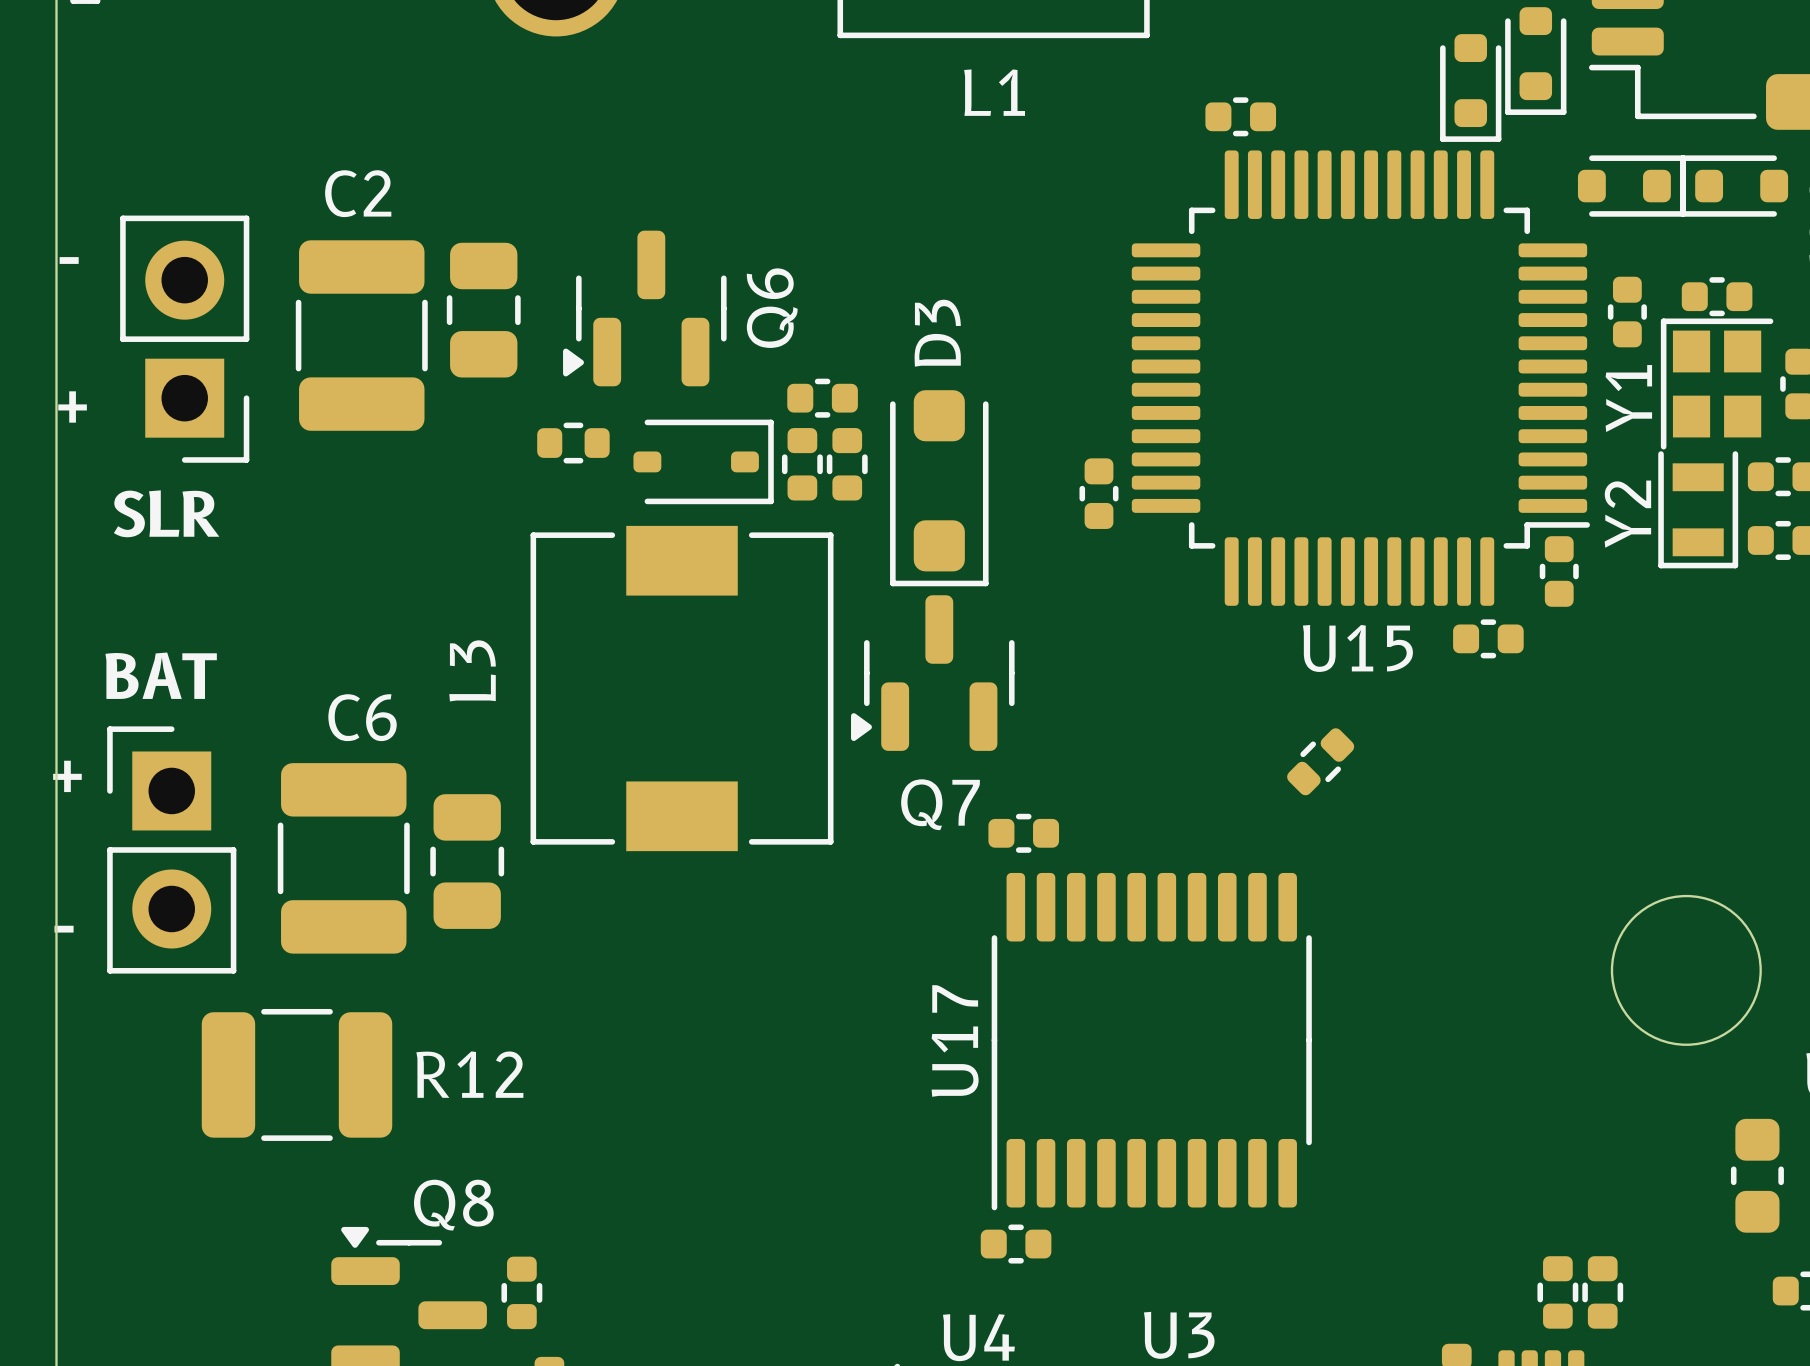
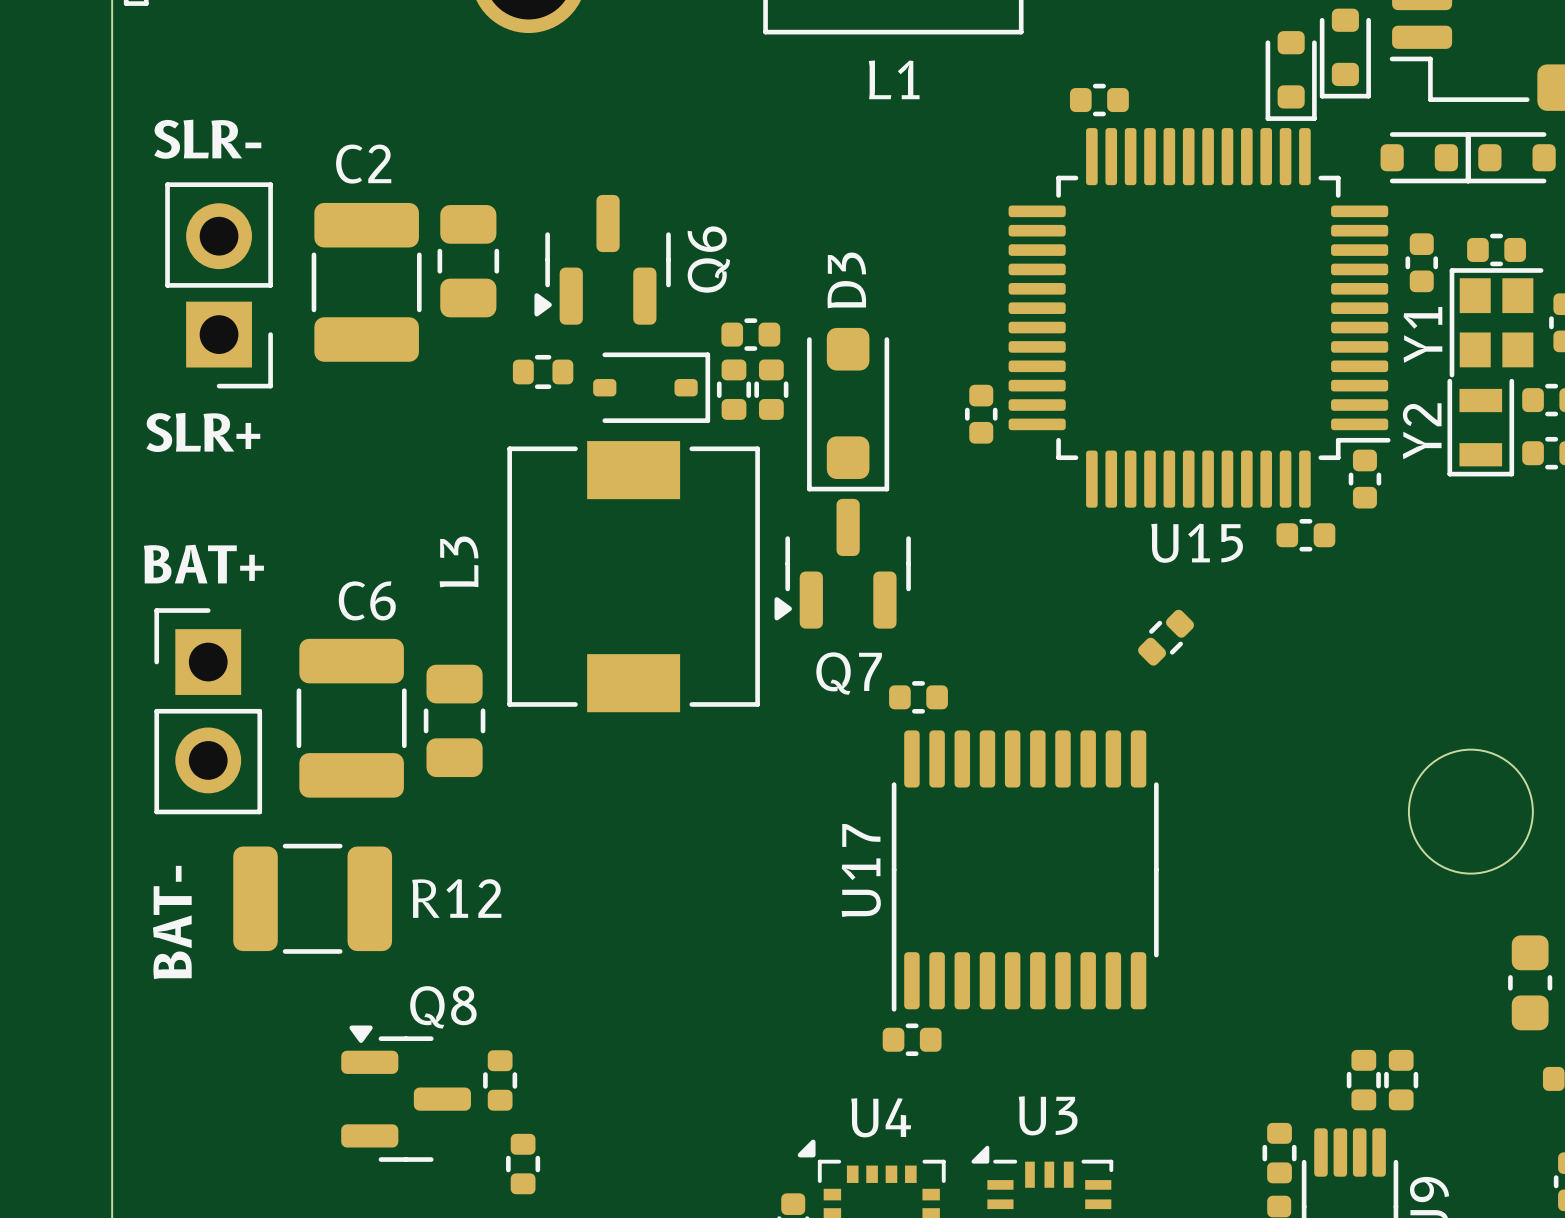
text: none -> SLR- (207, 139)
text: - (69, 260) -> none
text: + (72, 406) -> none
text: SLR (166, 513) -> SLR+ (203, 432)
text: BAT (161, 675) -> BAT+ (203, 564)
text: + (67, 776) -> none
text: - (64, 929) -> none
text: none -> BAT- (172, 922)

